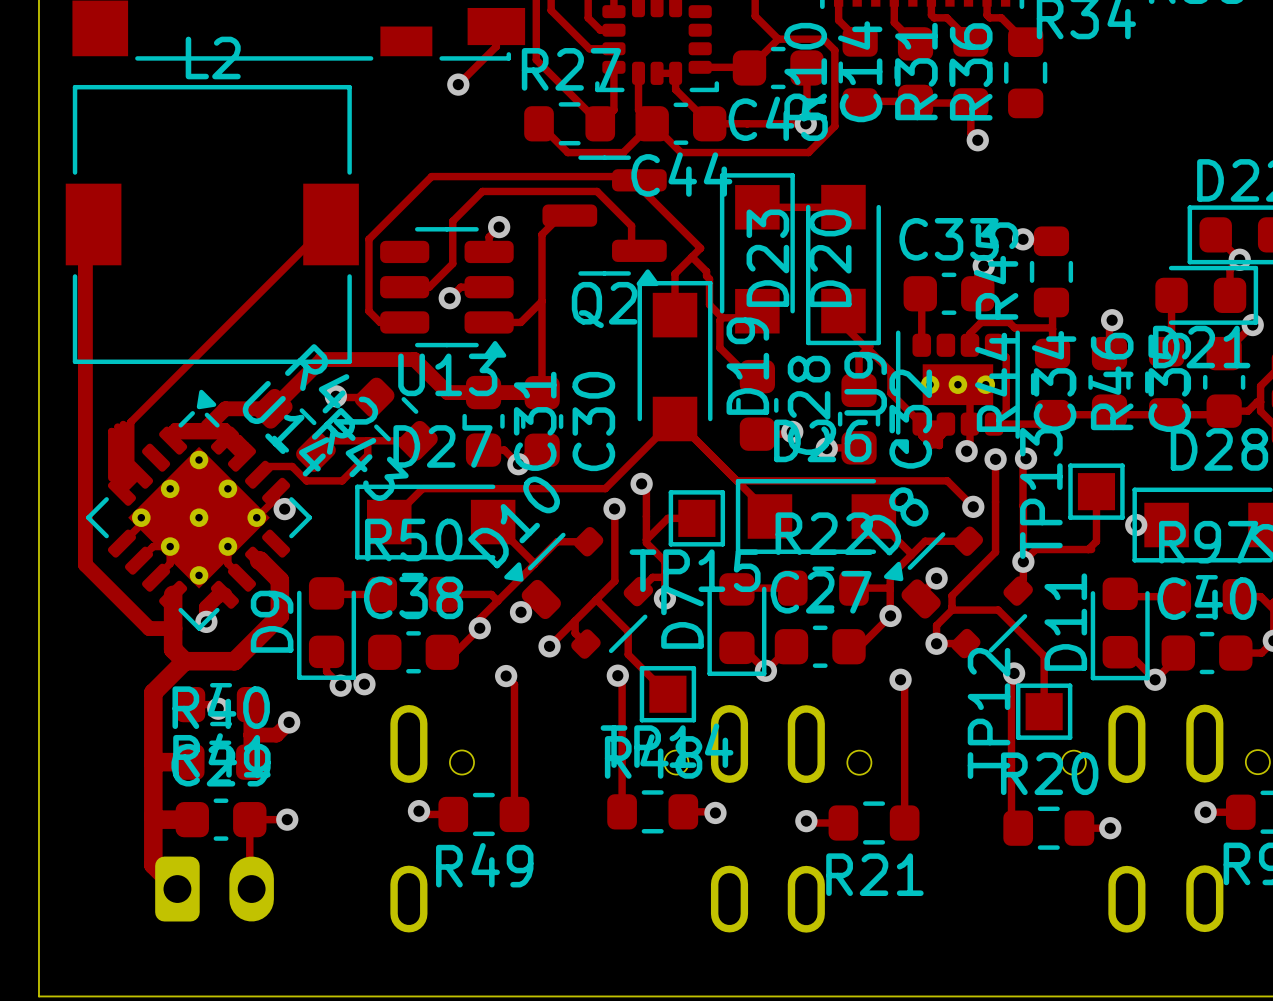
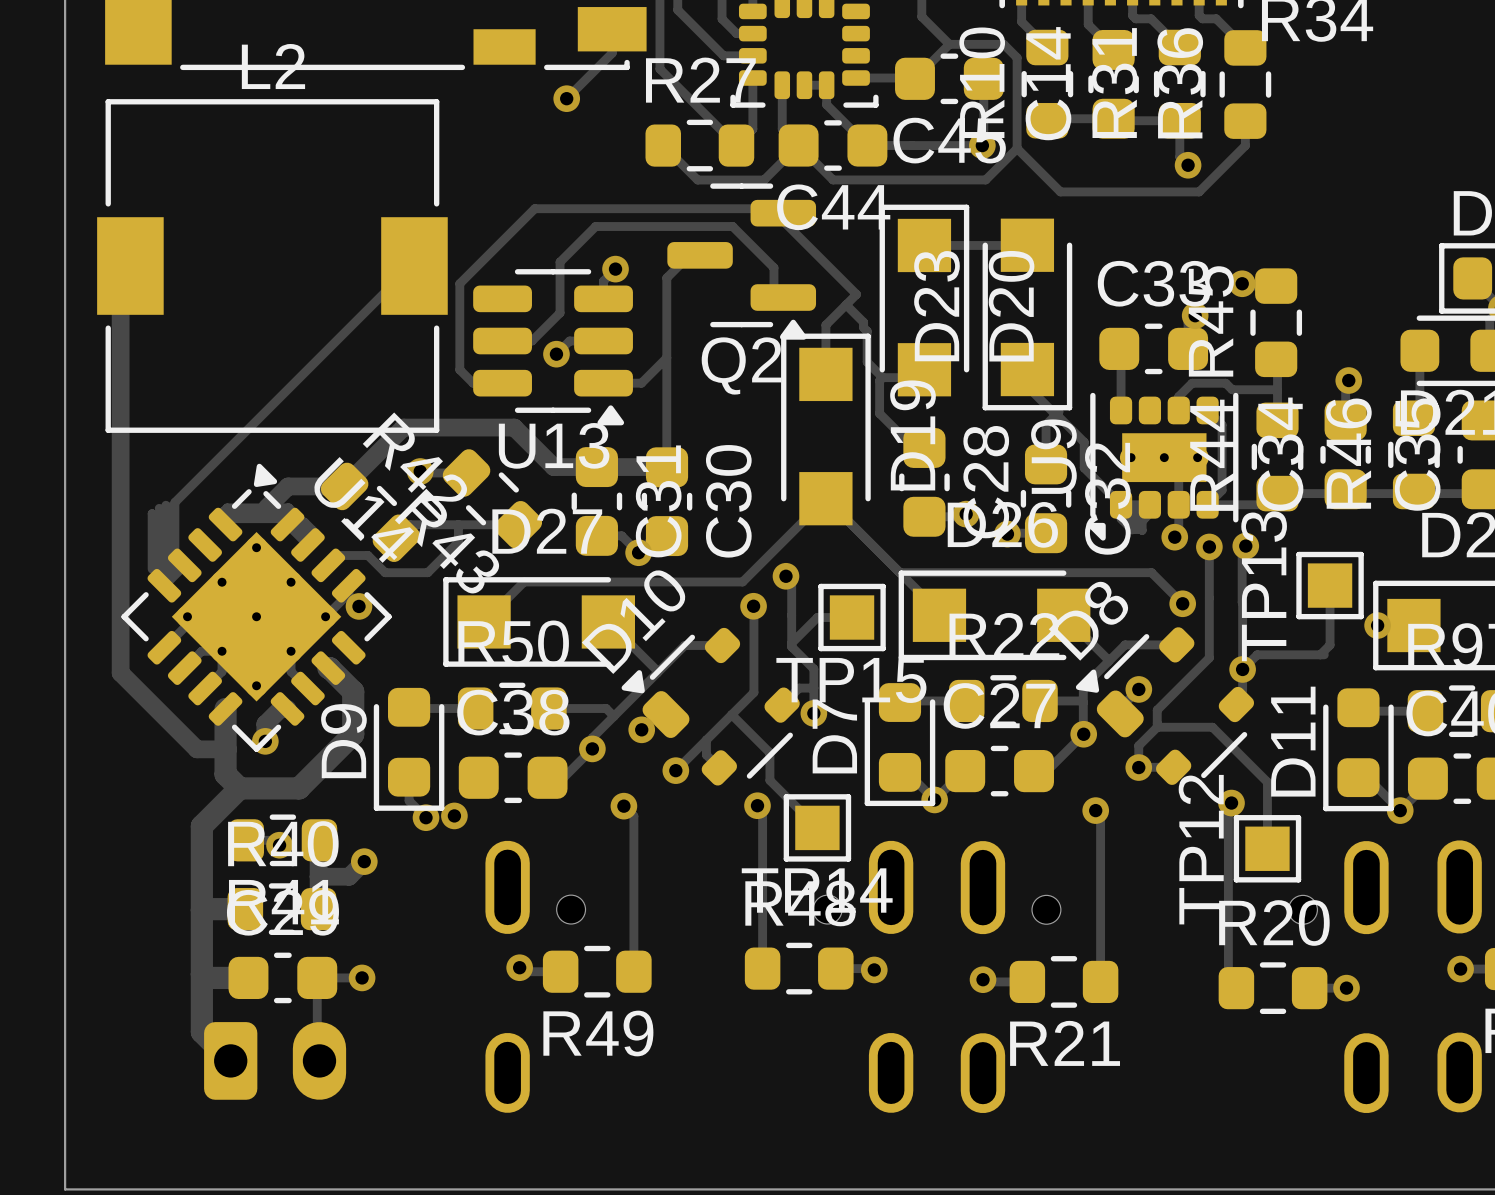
track: none -> (1245, 121) (1245, 145) (1199, 191) (1060, 191) (1017, 148)

